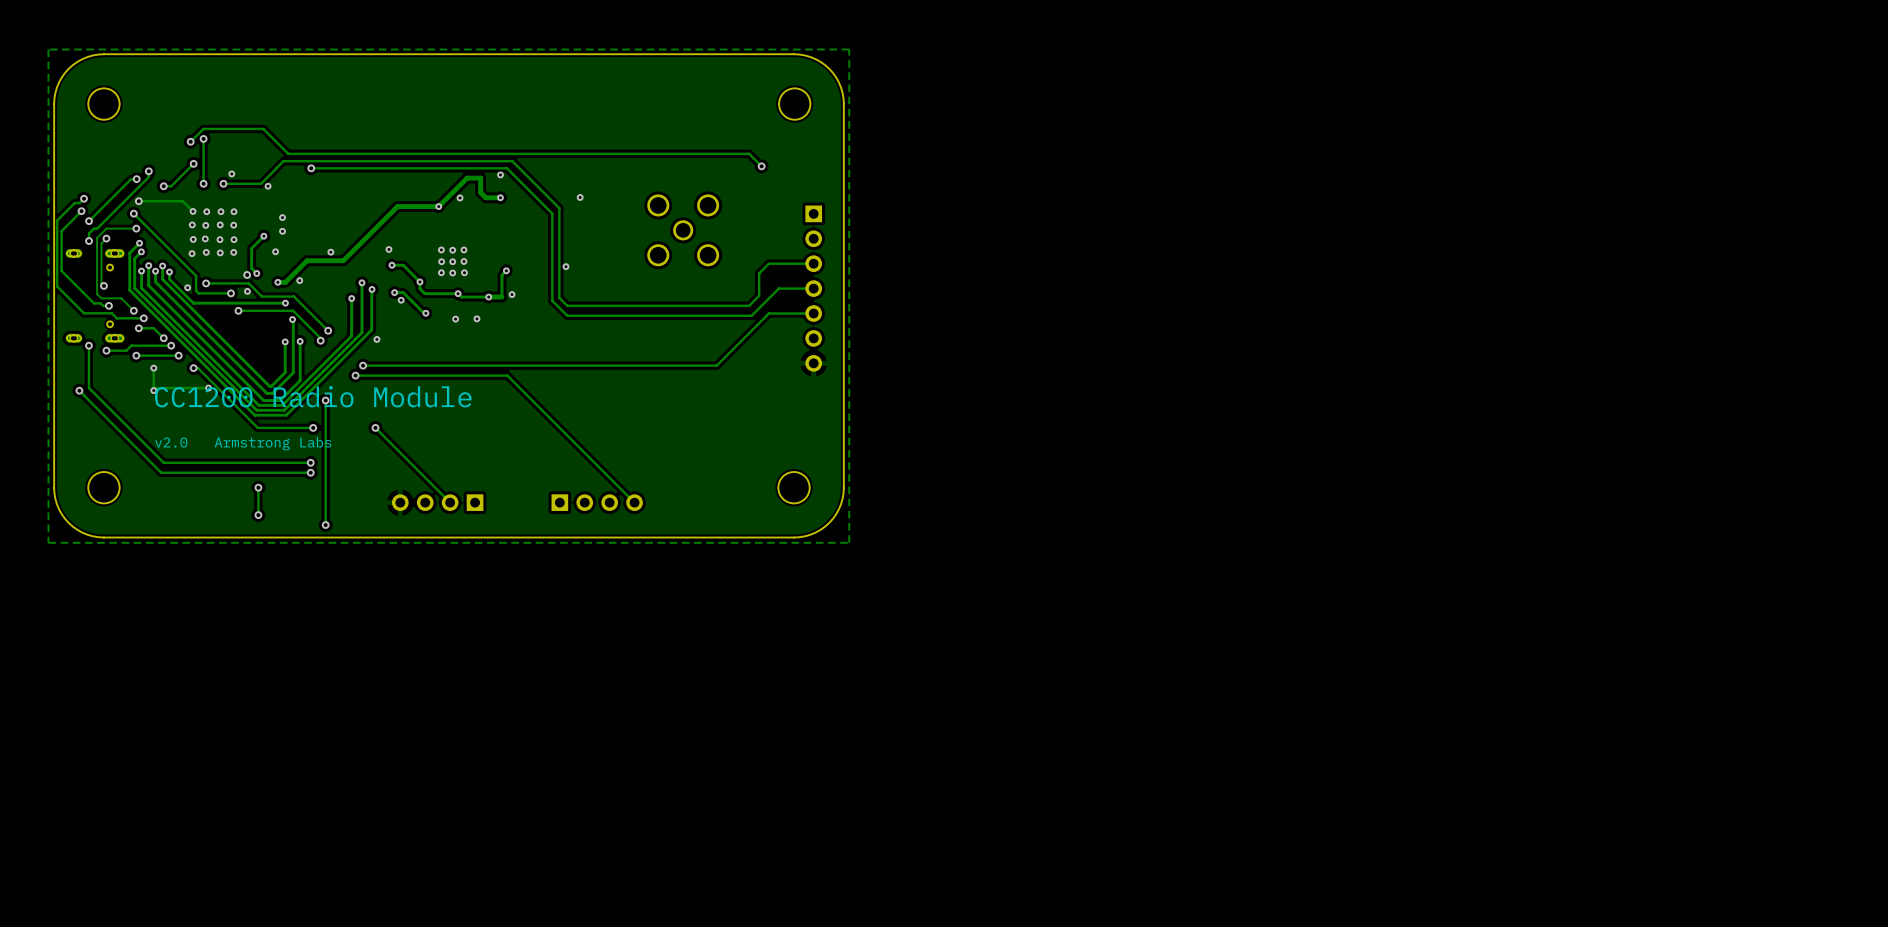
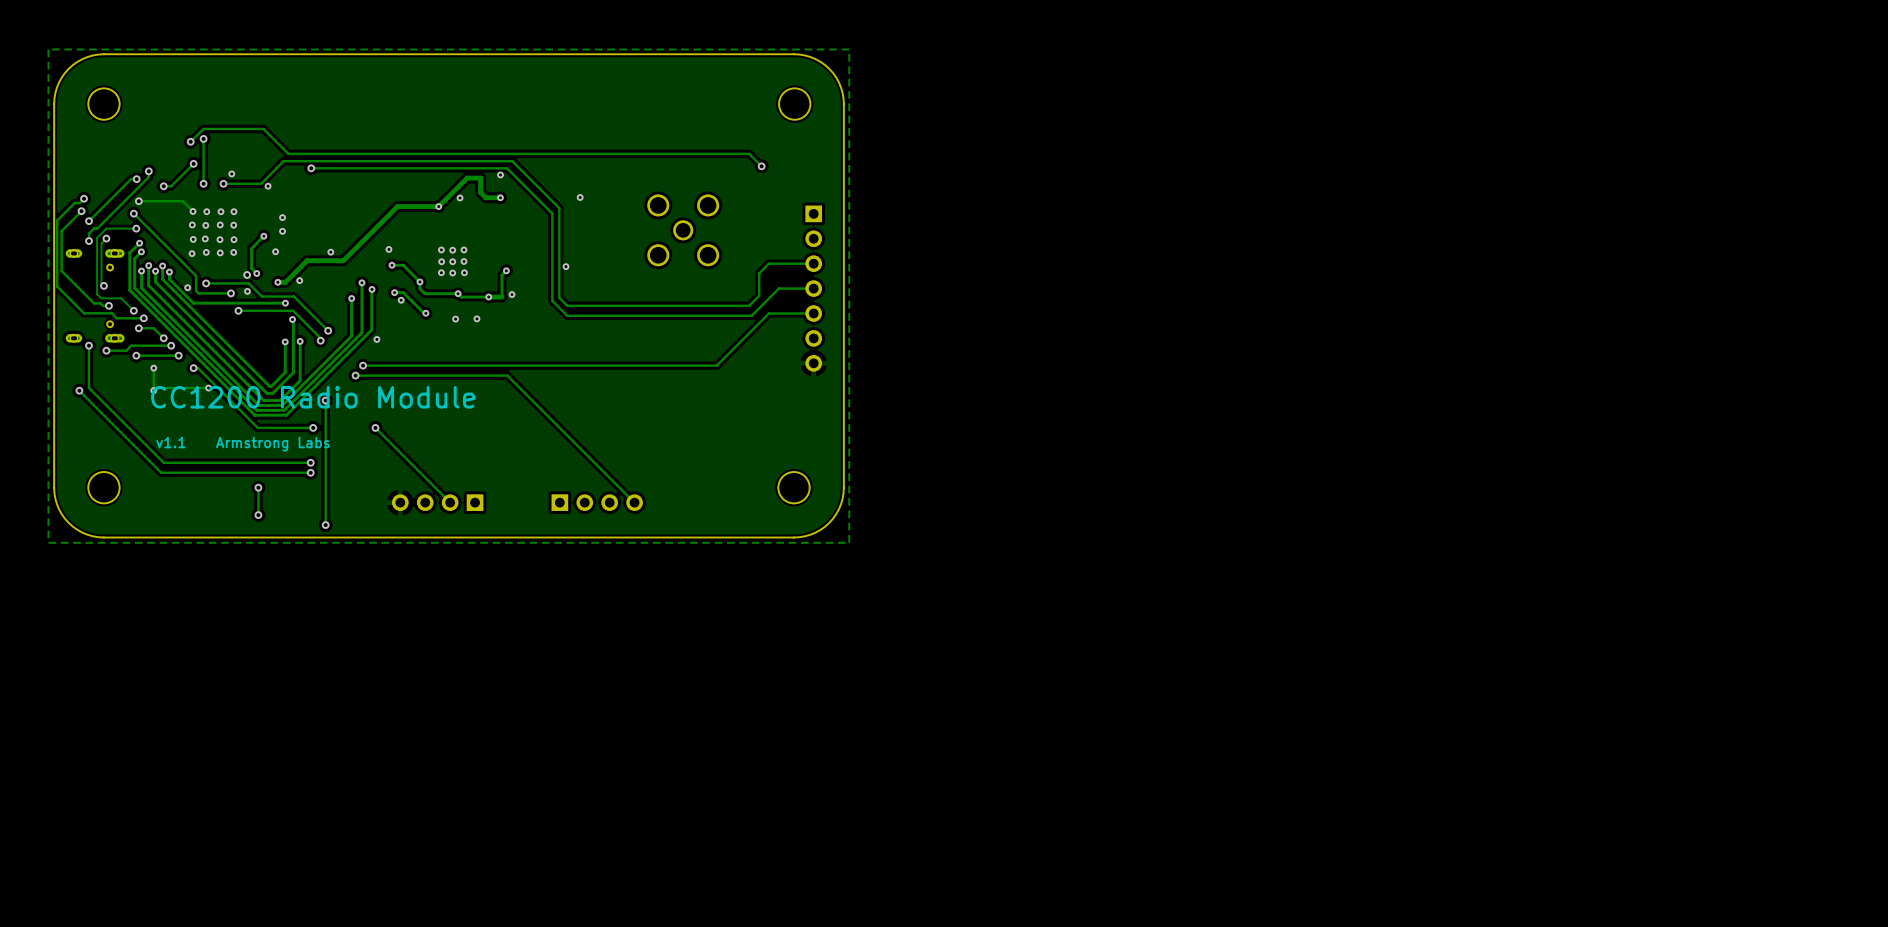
text: v2.0 (171, 442) -> v1.1 (170, 442)

